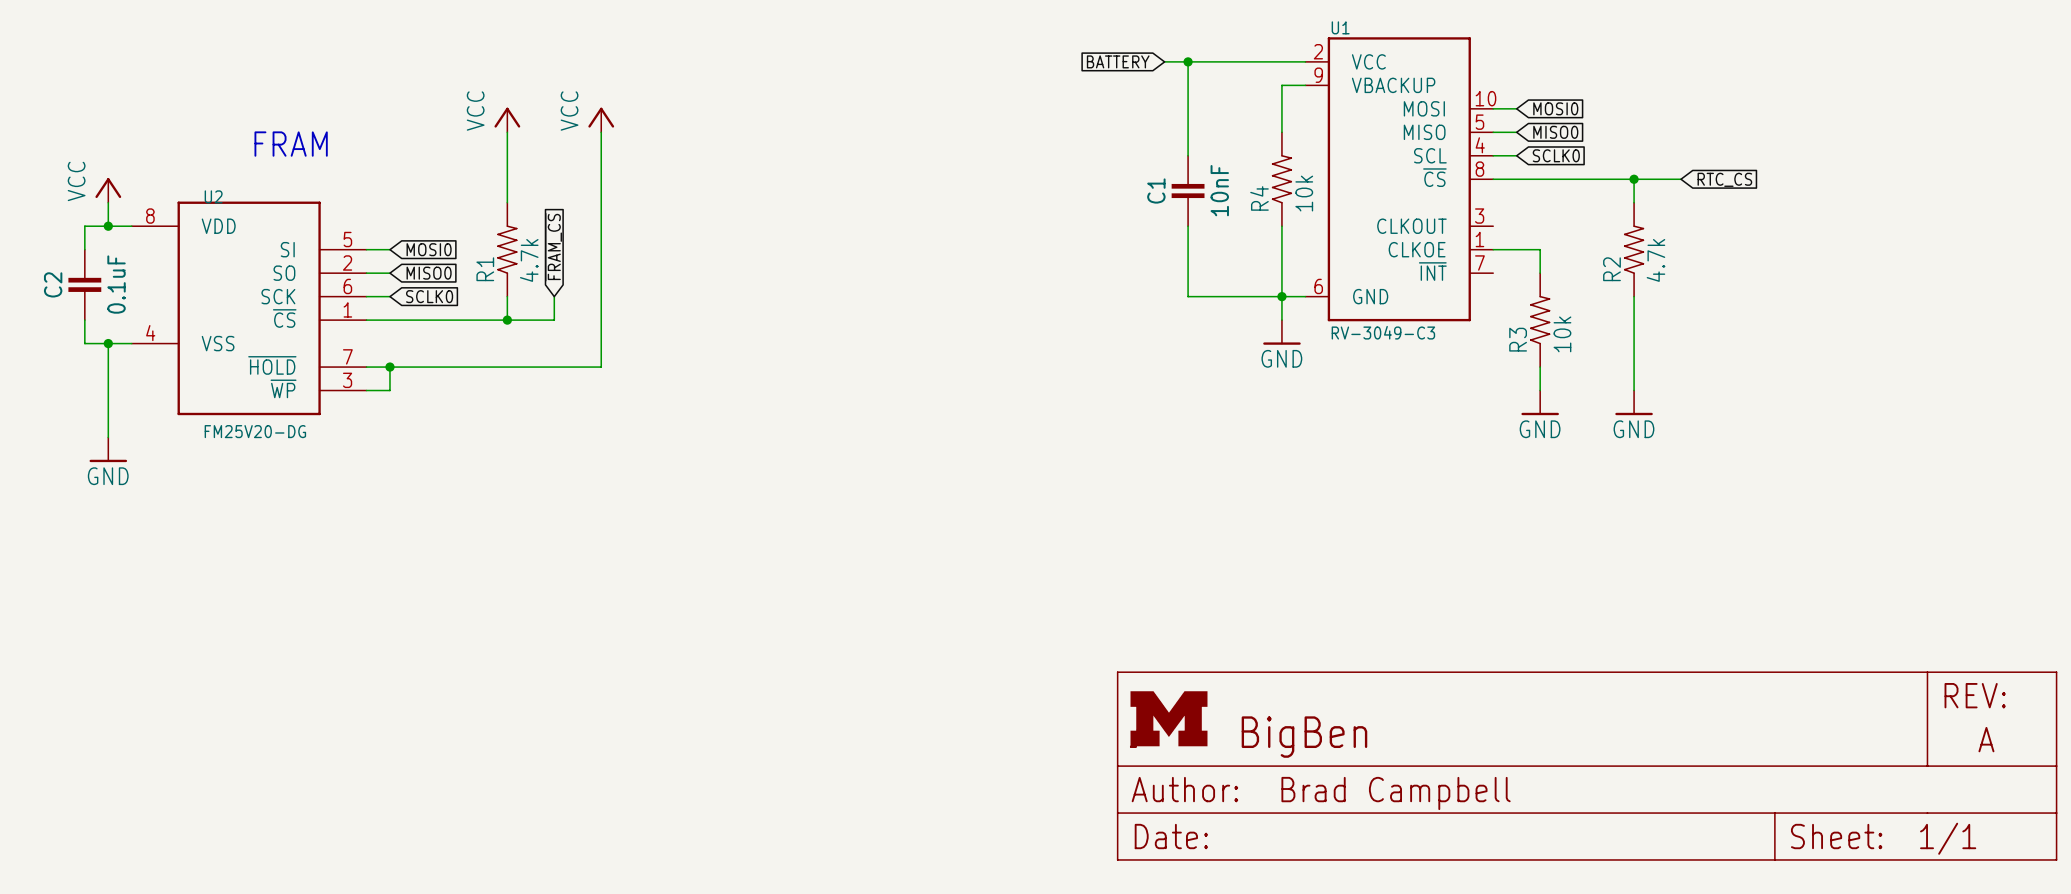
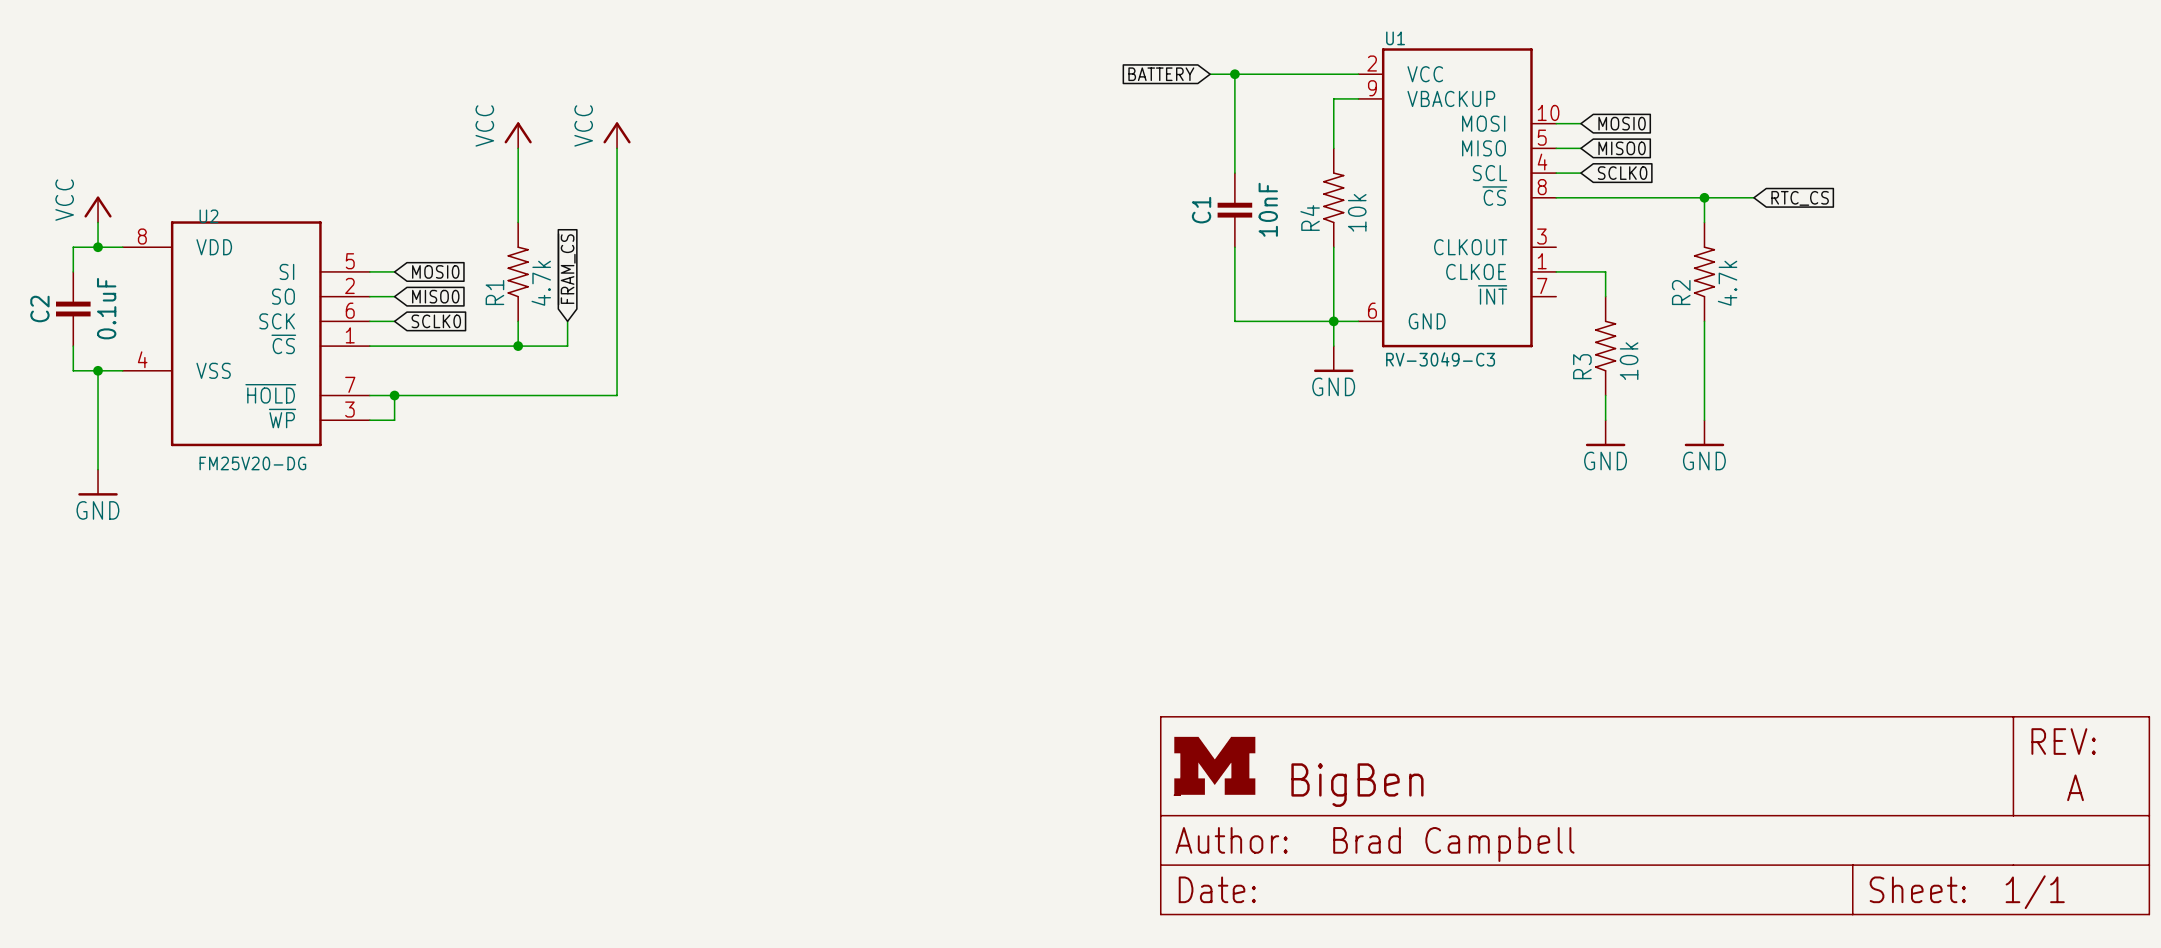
text: FRAM (291, 144) -> none

